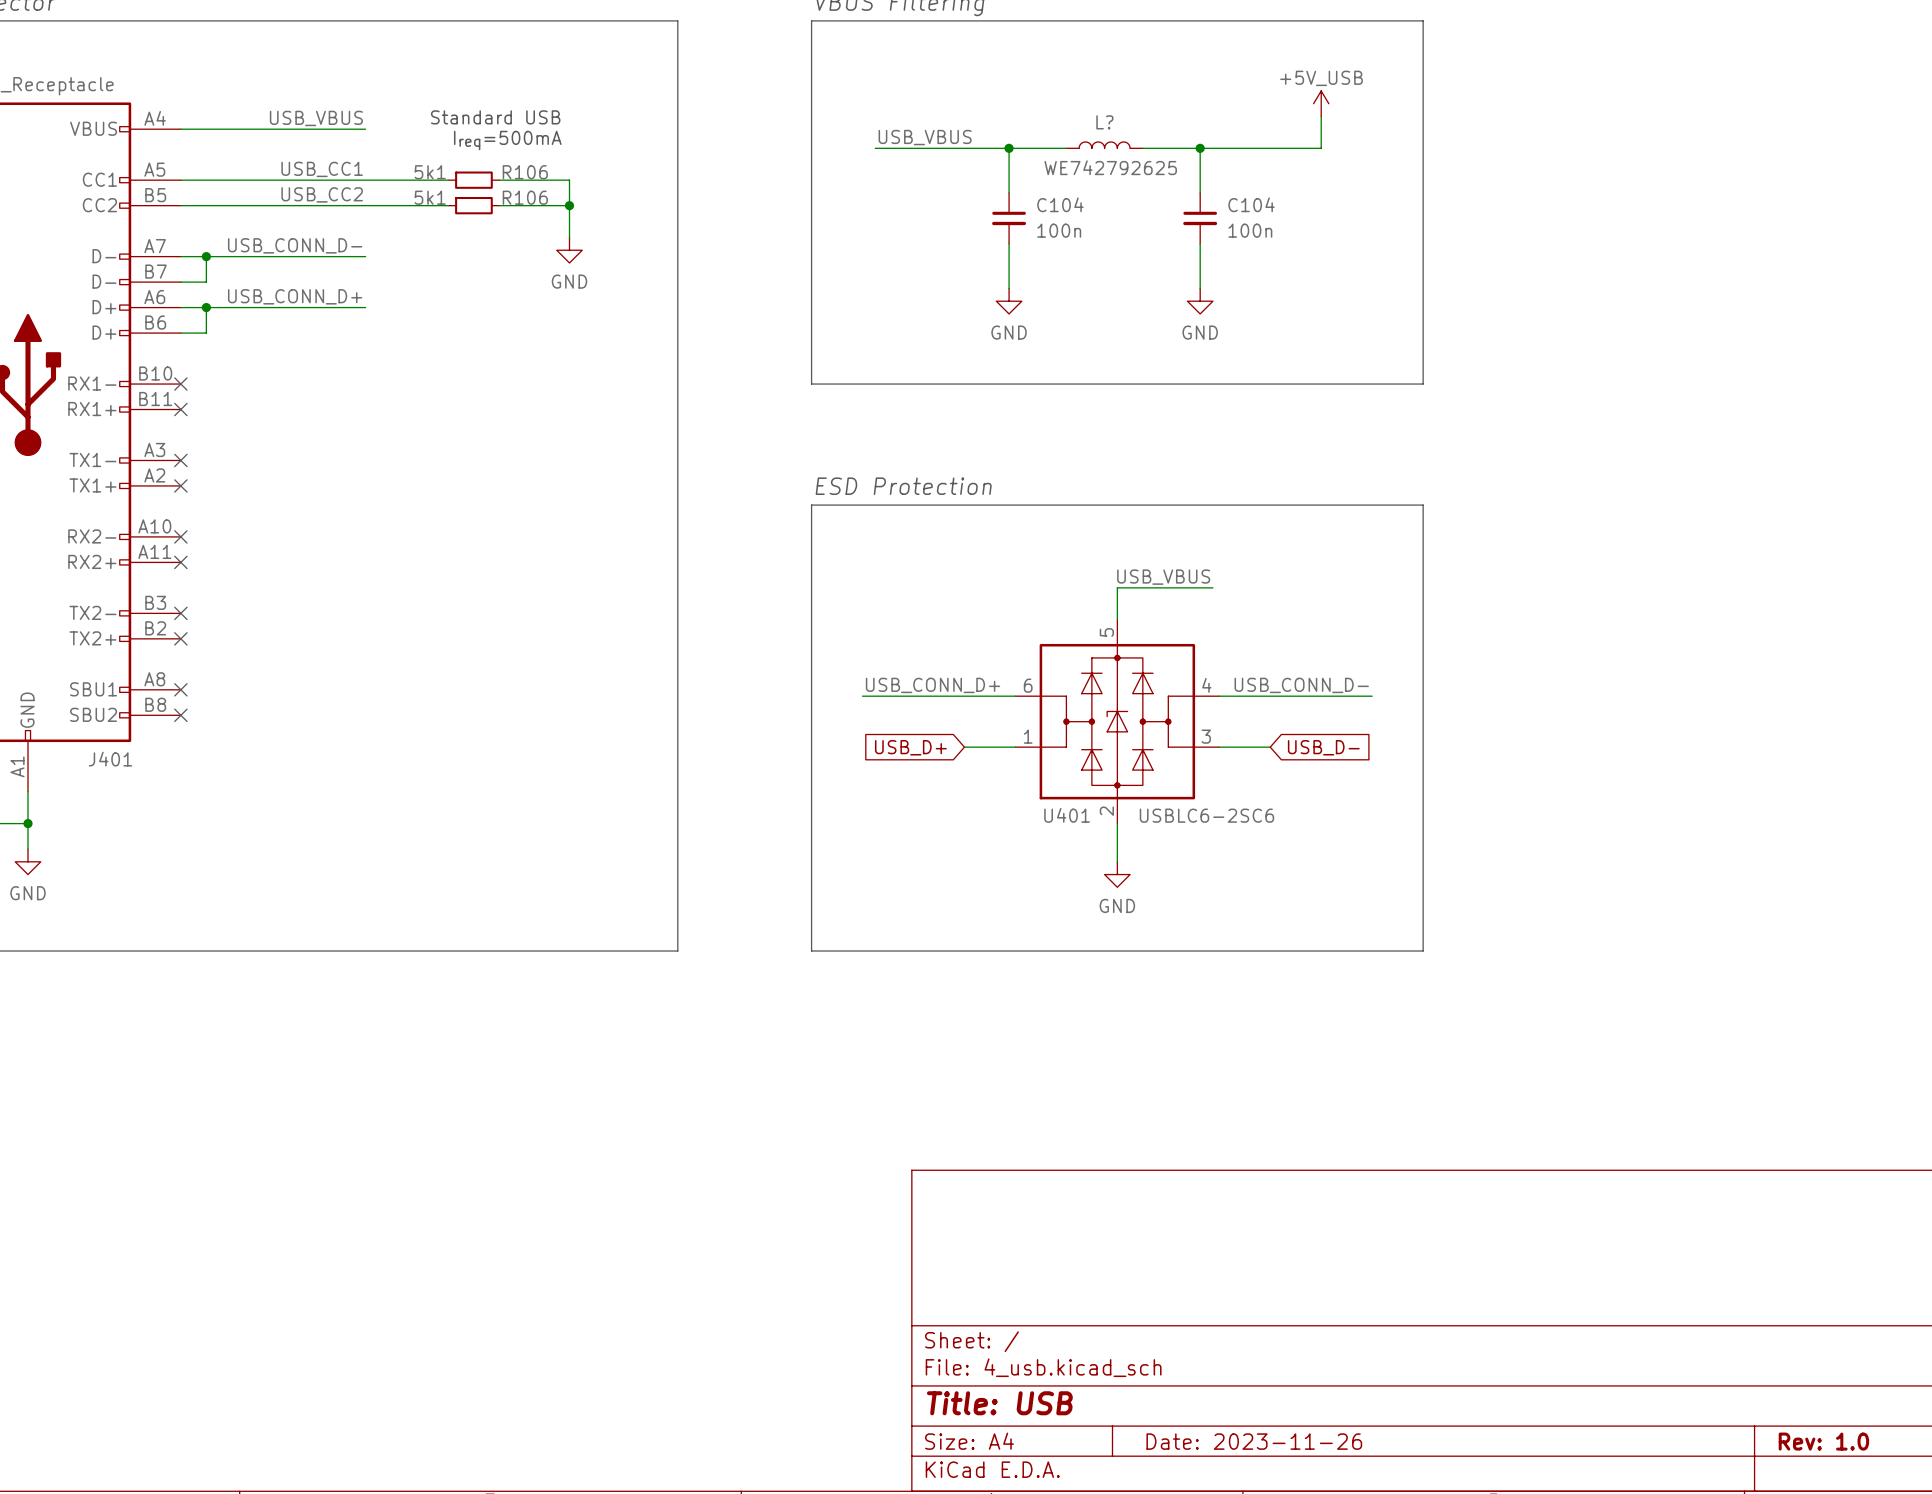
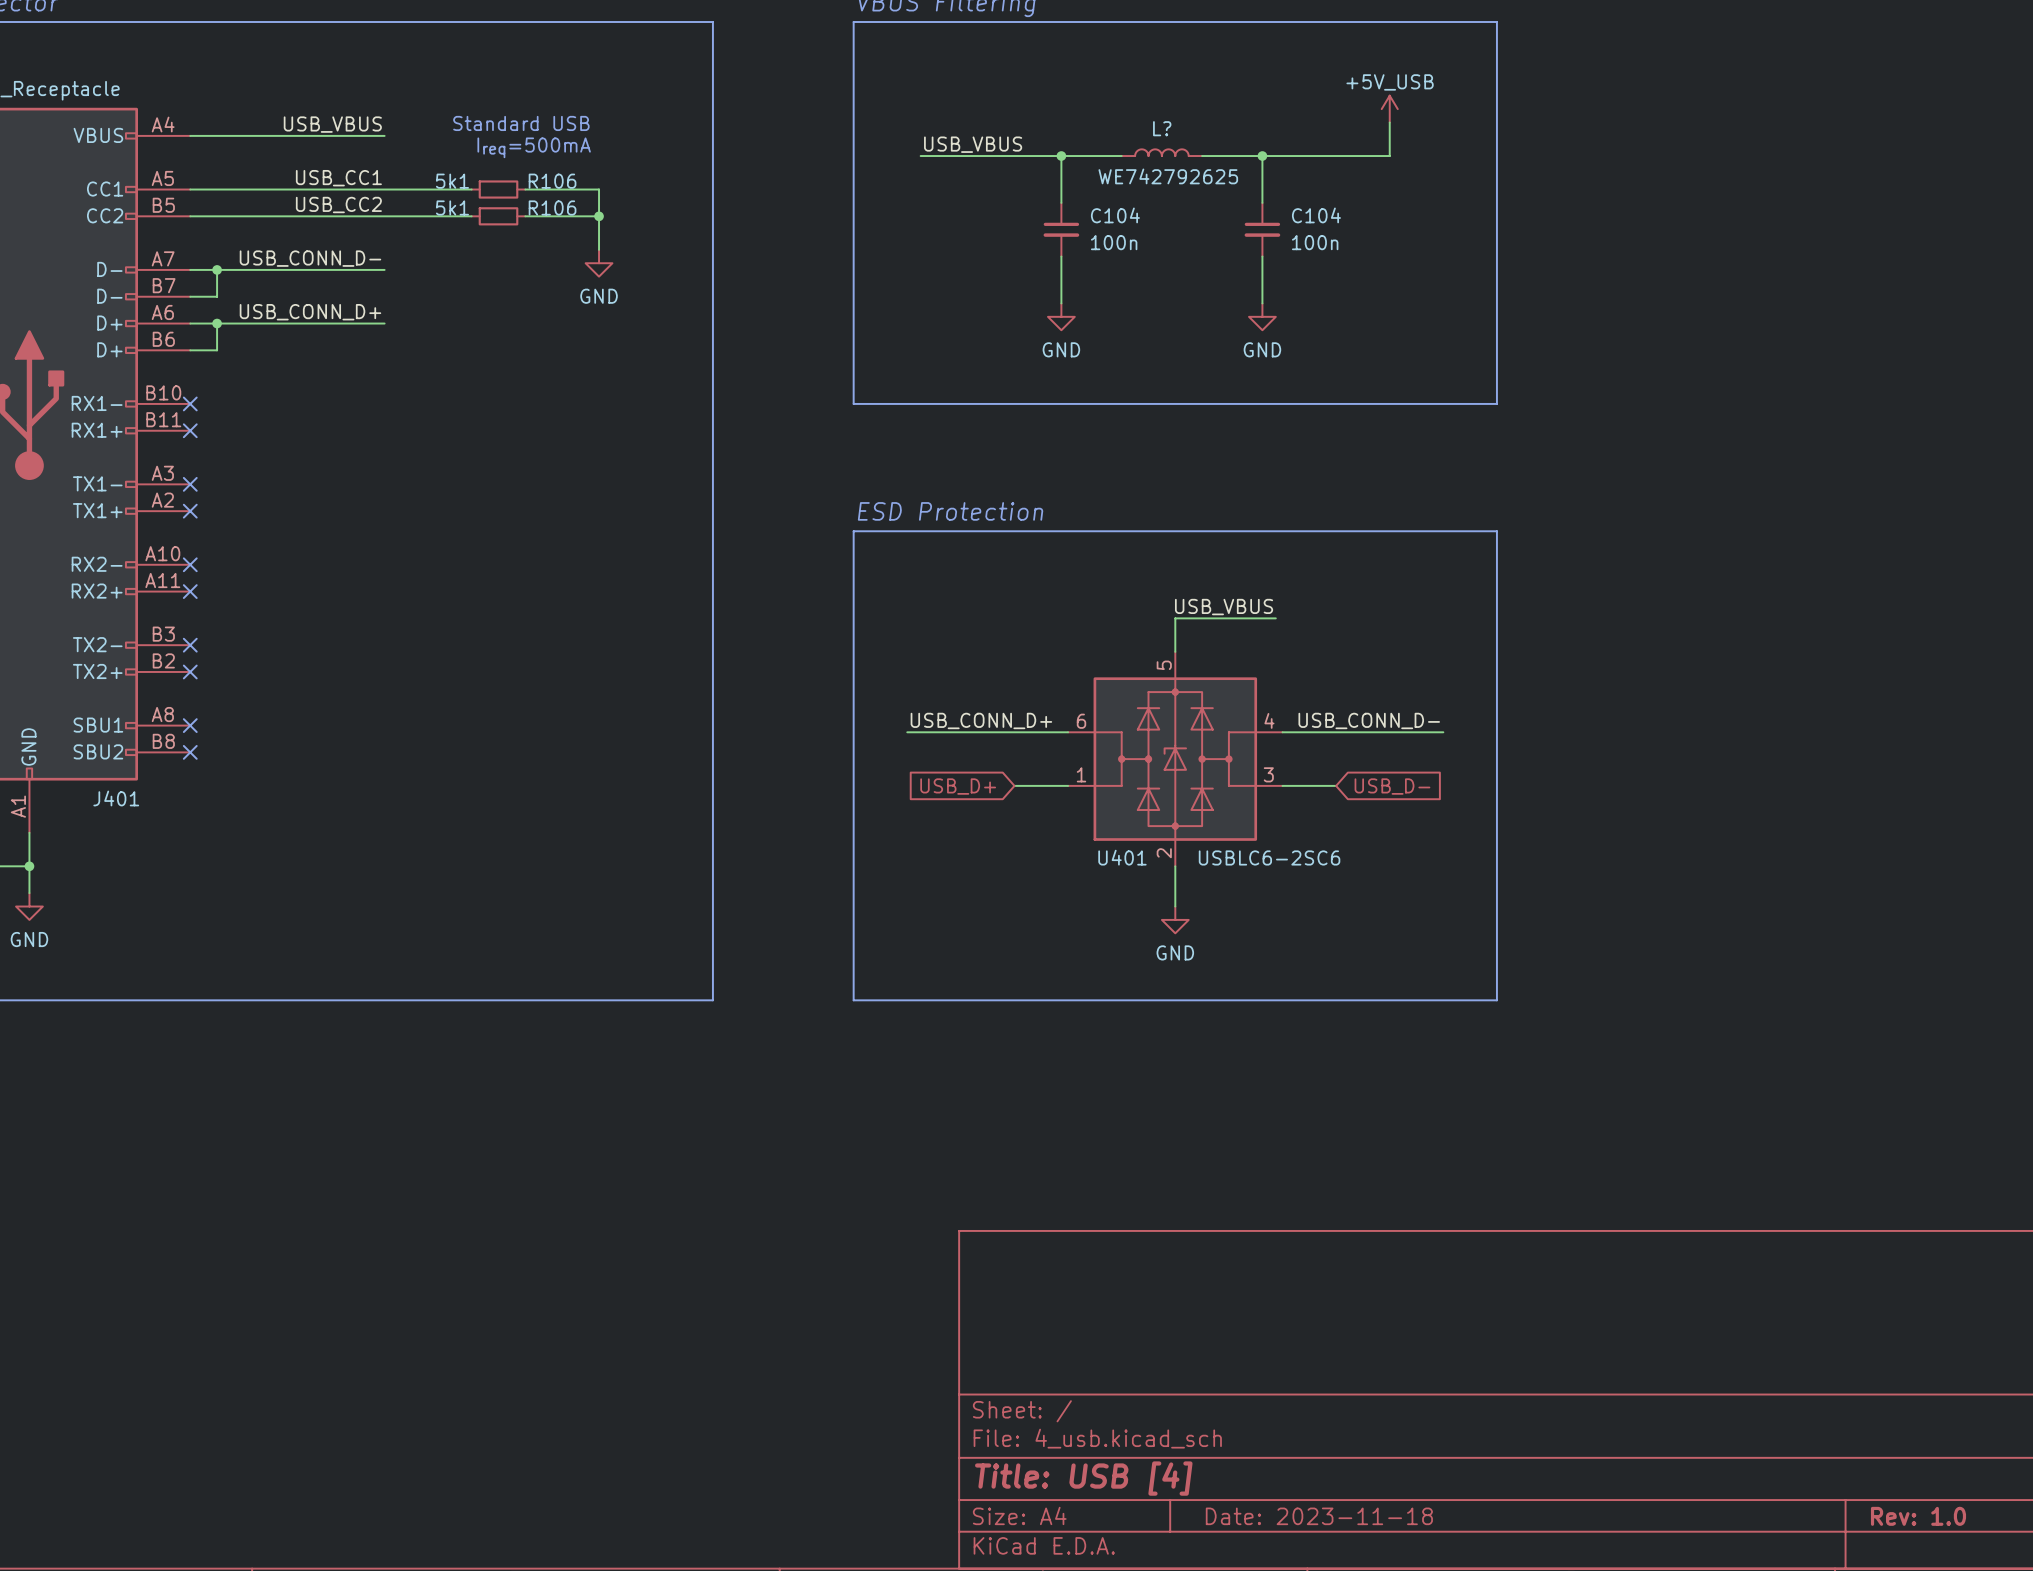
title block: Title: USB (999, 1403) -> Title: USB [4] (1083, 1478)
title block: Date: 2023-11-26 (1254, 1441) -> Date: 2023-11-18 (1319, 1516)

